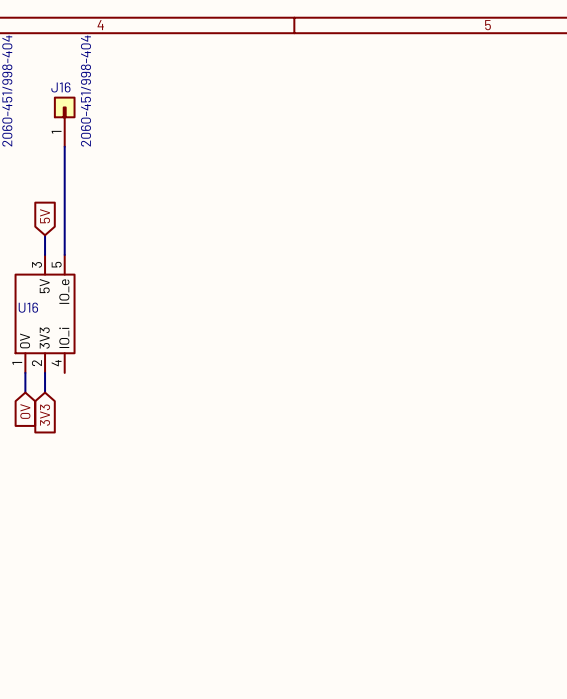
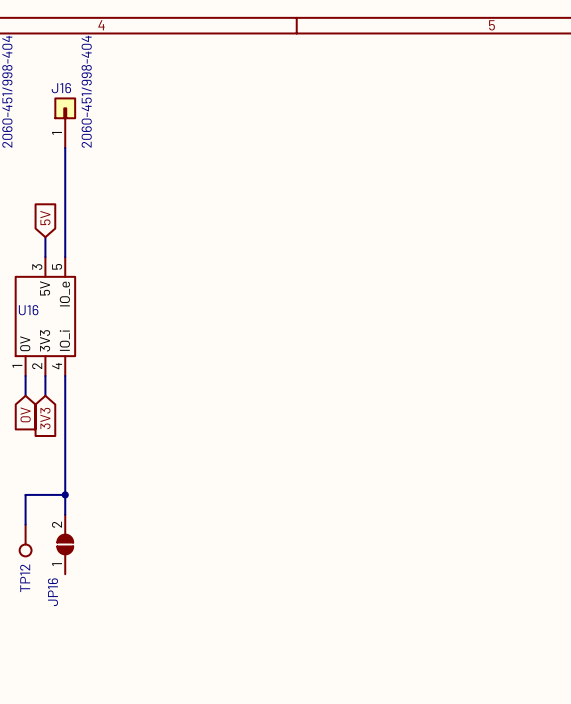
wire: none -> (65, 375) (65, 514)
wire: none -> (65, 494) (25, 494) (25, 524)
junction: none -> (65, 494)
TP12: none -> (25, 540)
JP16: none -> (65, 544)

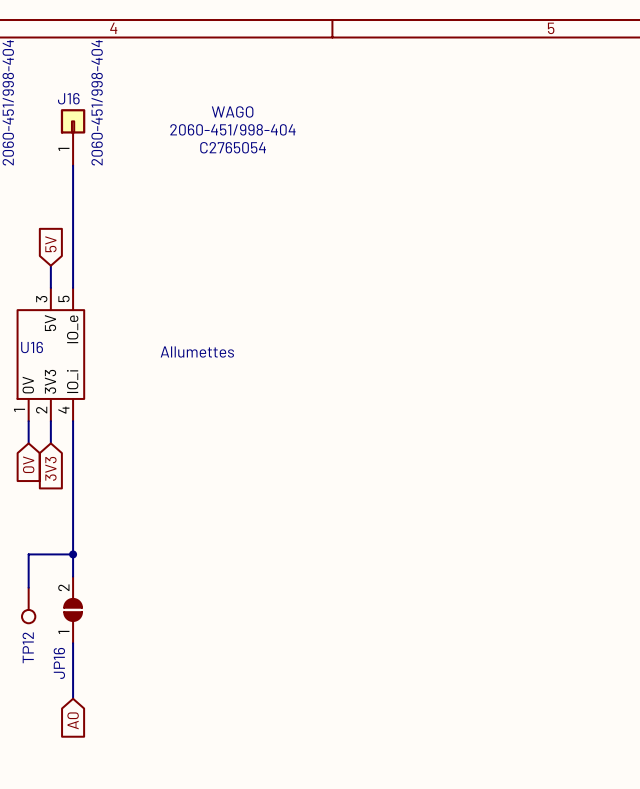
text: none -> WAGO (232, 111)
text: none -> 2060-451/998-404 (232, 129)
text: none -> C2765054 (233, 147)
text: none -> Allumettes (197, 352)
wire: none -> (73, 643) (73, 698)
global label: none -> A0 (73, 720)

